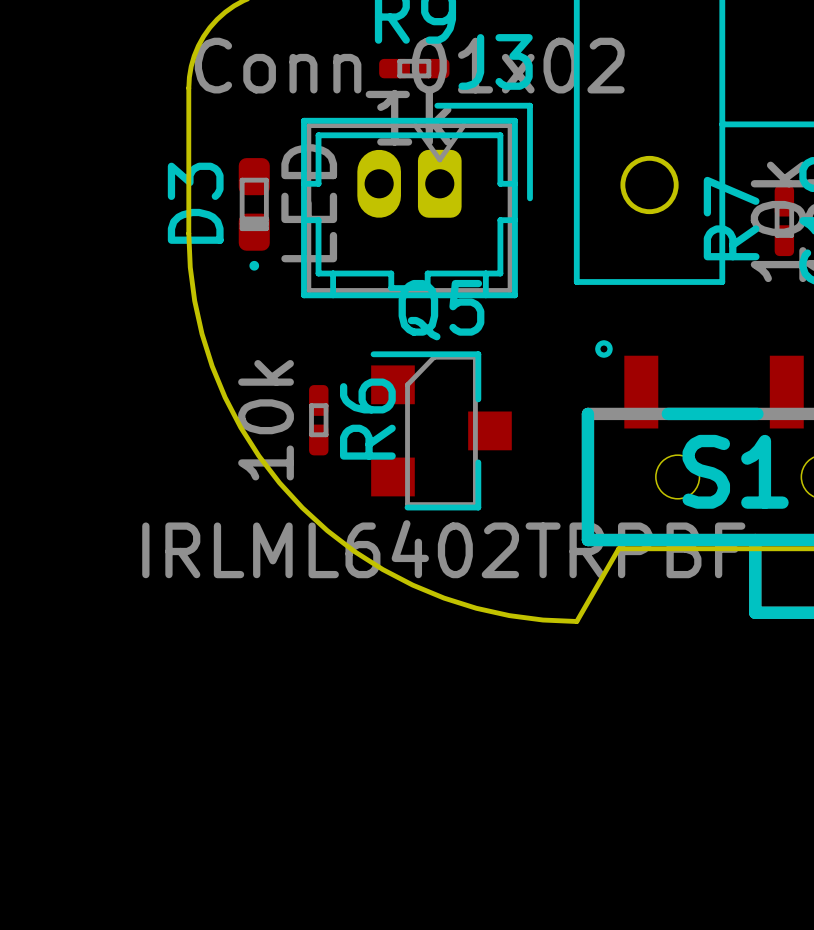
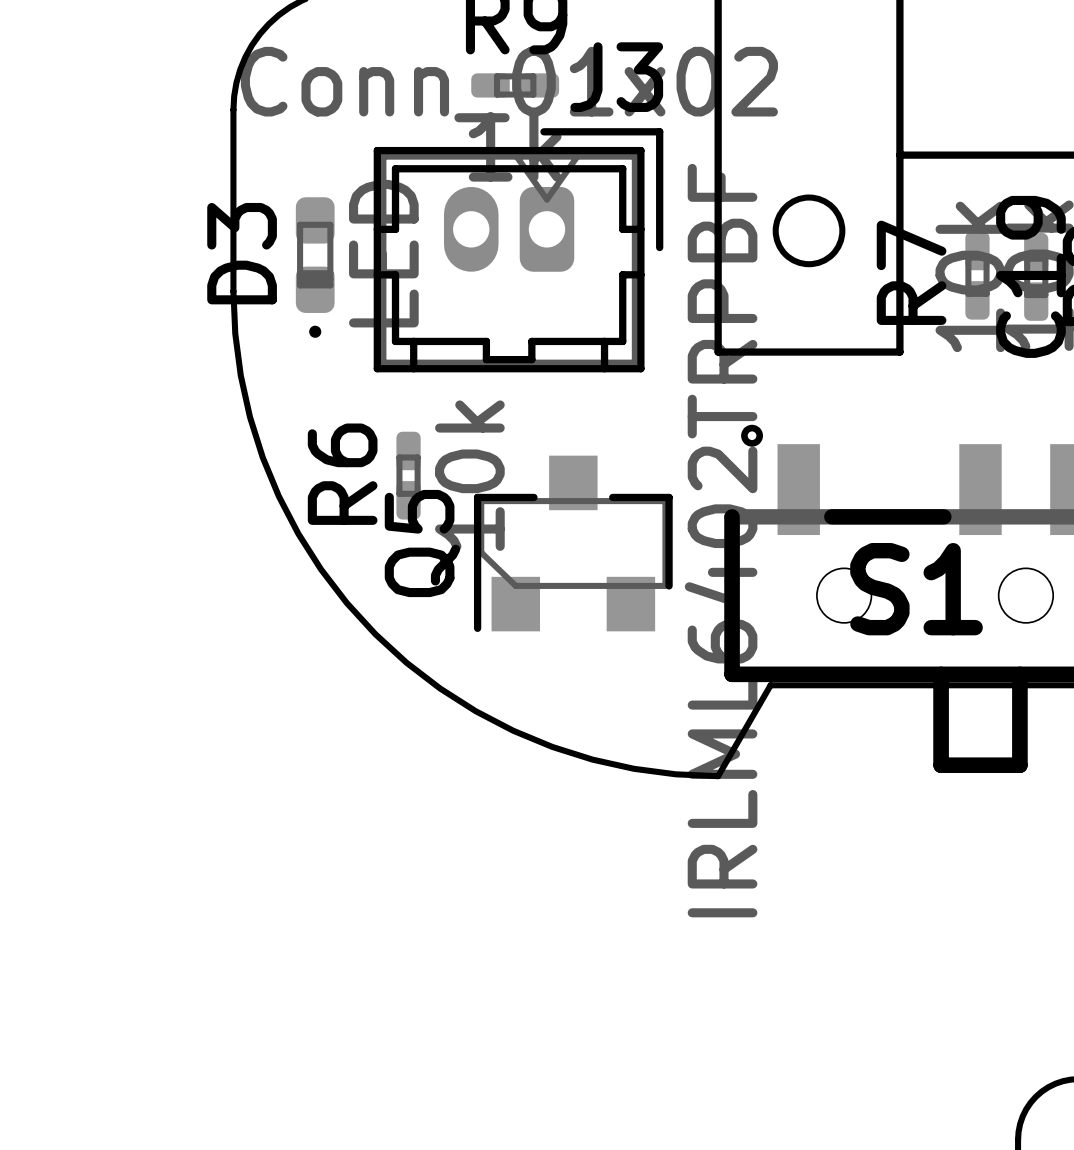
R6 name position: R6 (367, 419) -> R6 (342, 474)
R6 value position: 10k (266, 420) -> 10k (469, 475)
R6 position: (318, 420) -> (408, 475)
Q5 rotation: 0° (441, 430) -> 90° counterclockwise (573, 543)

